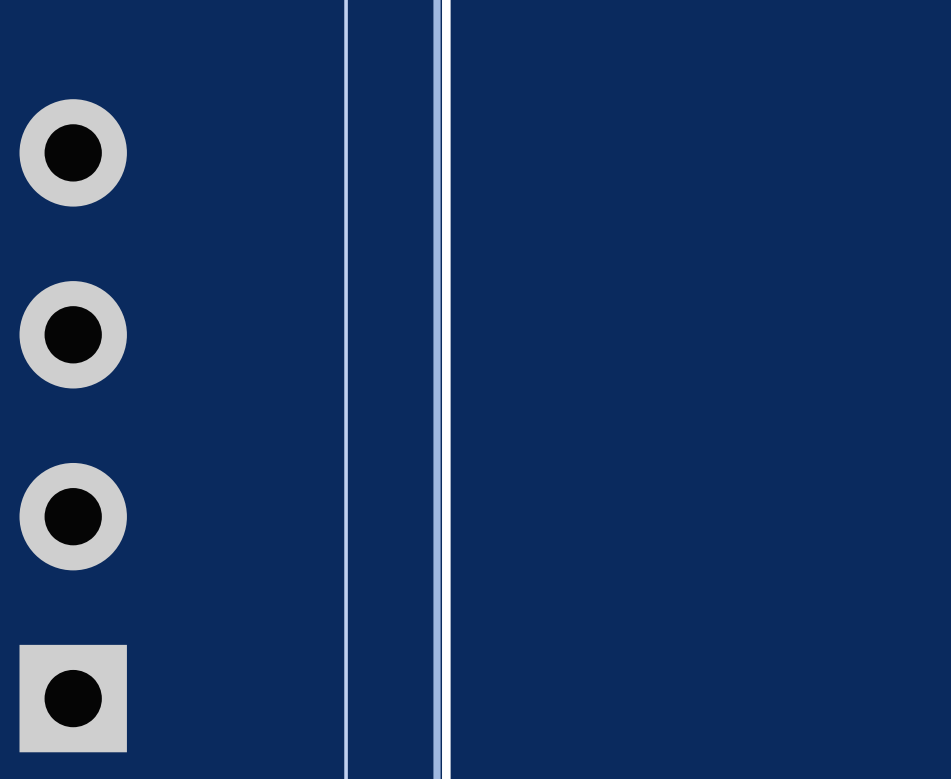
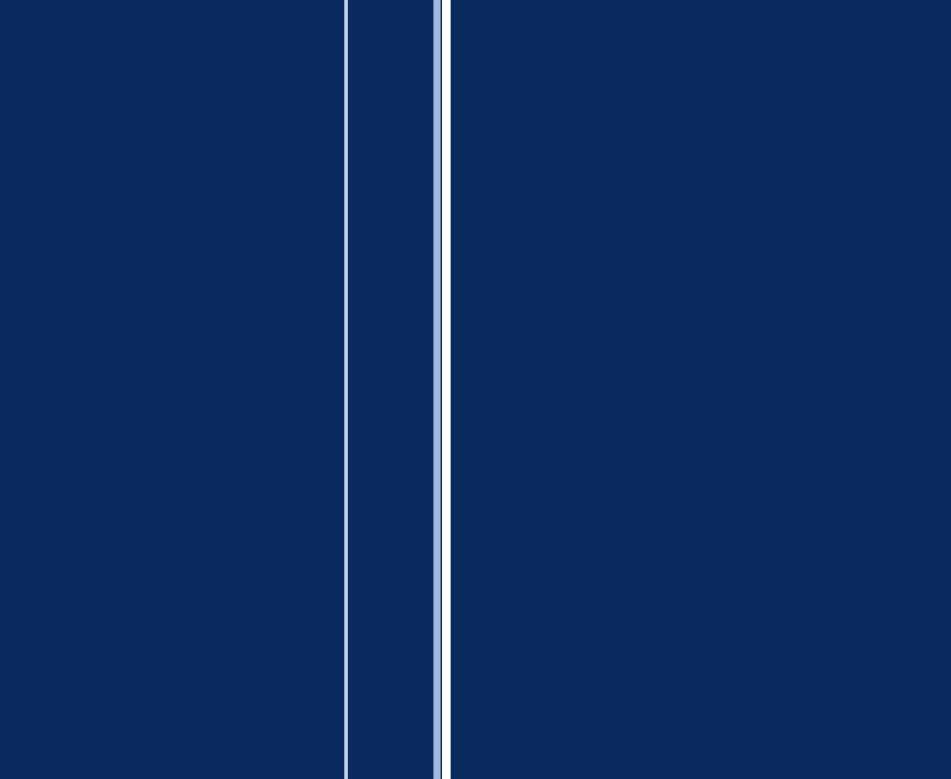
part: (73, 425) -> none

